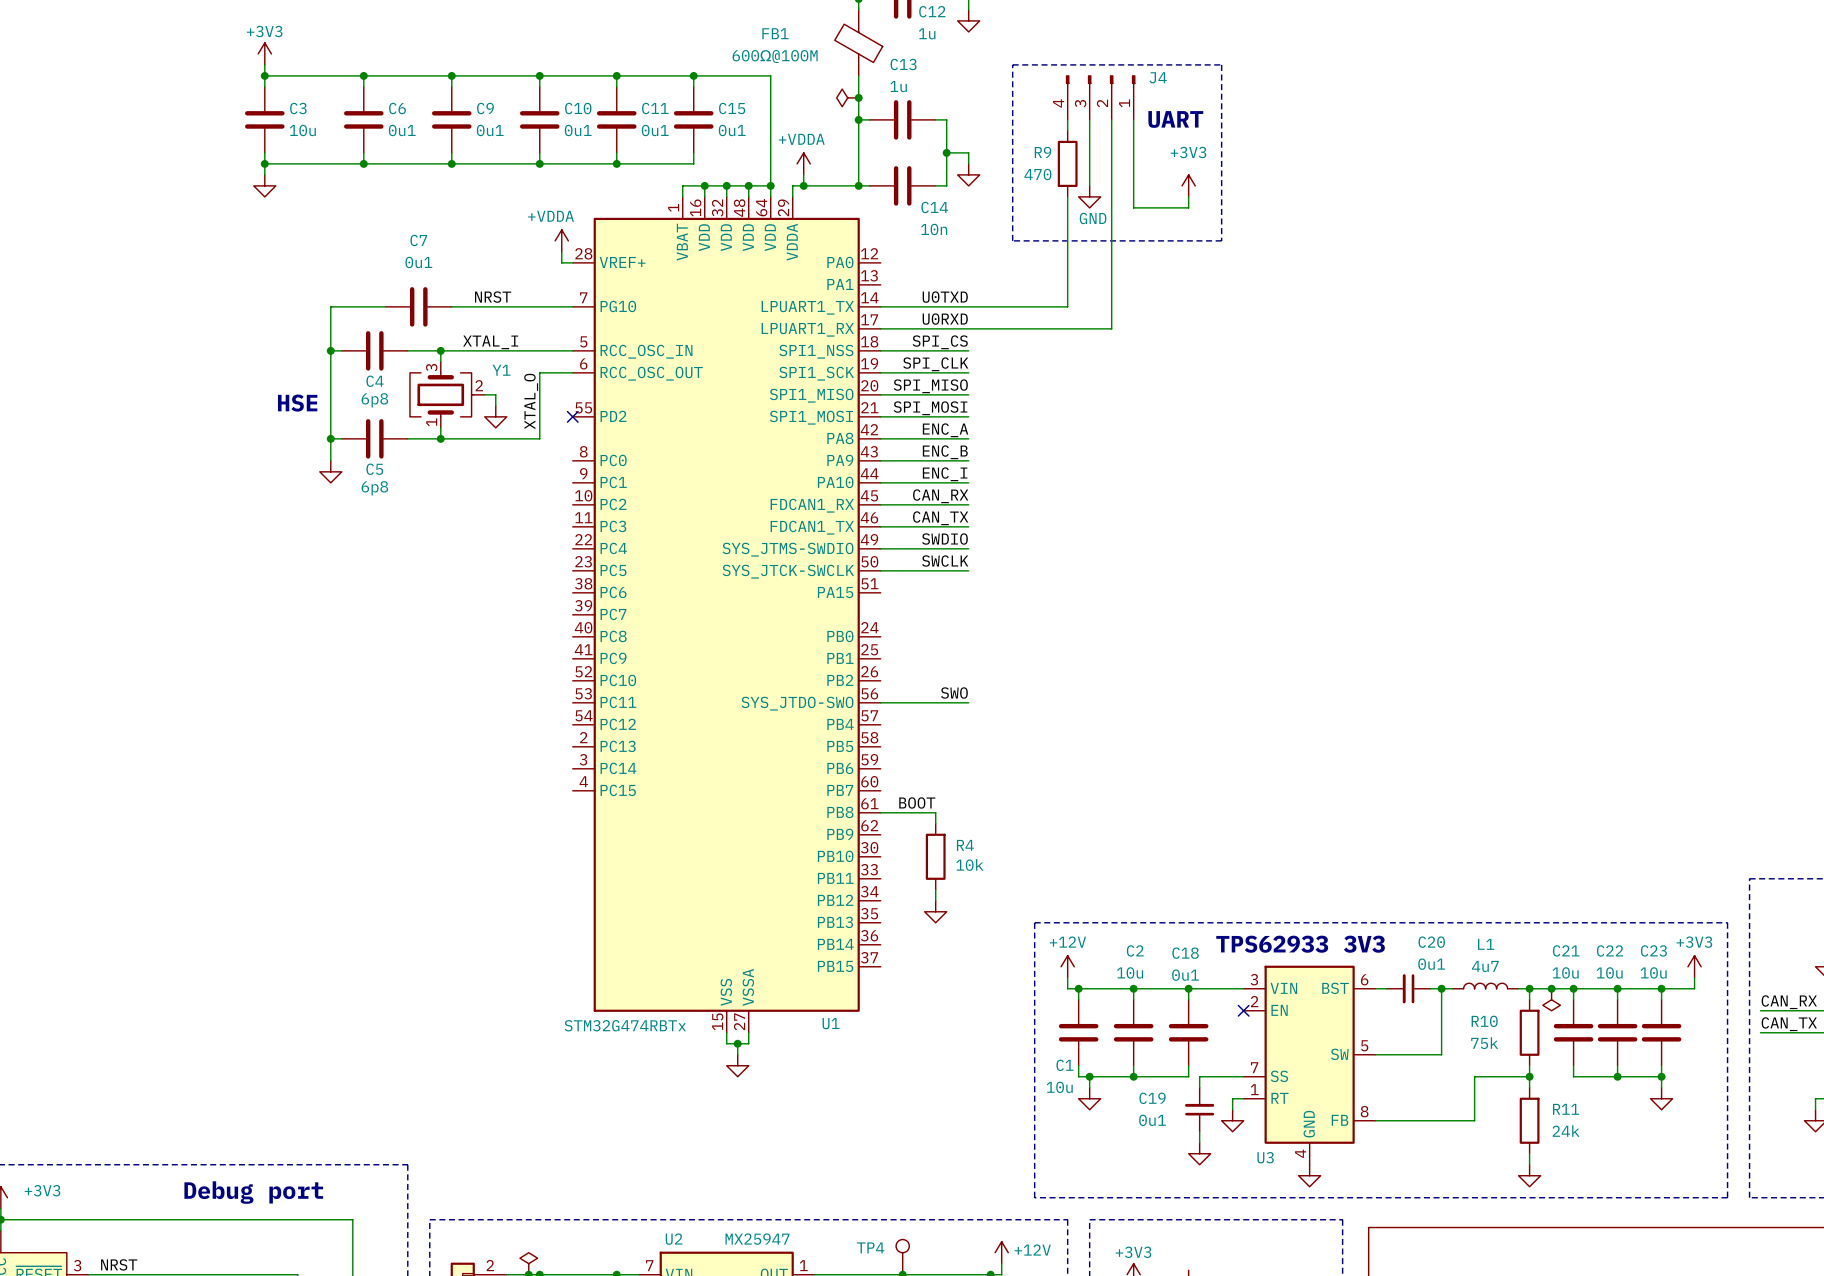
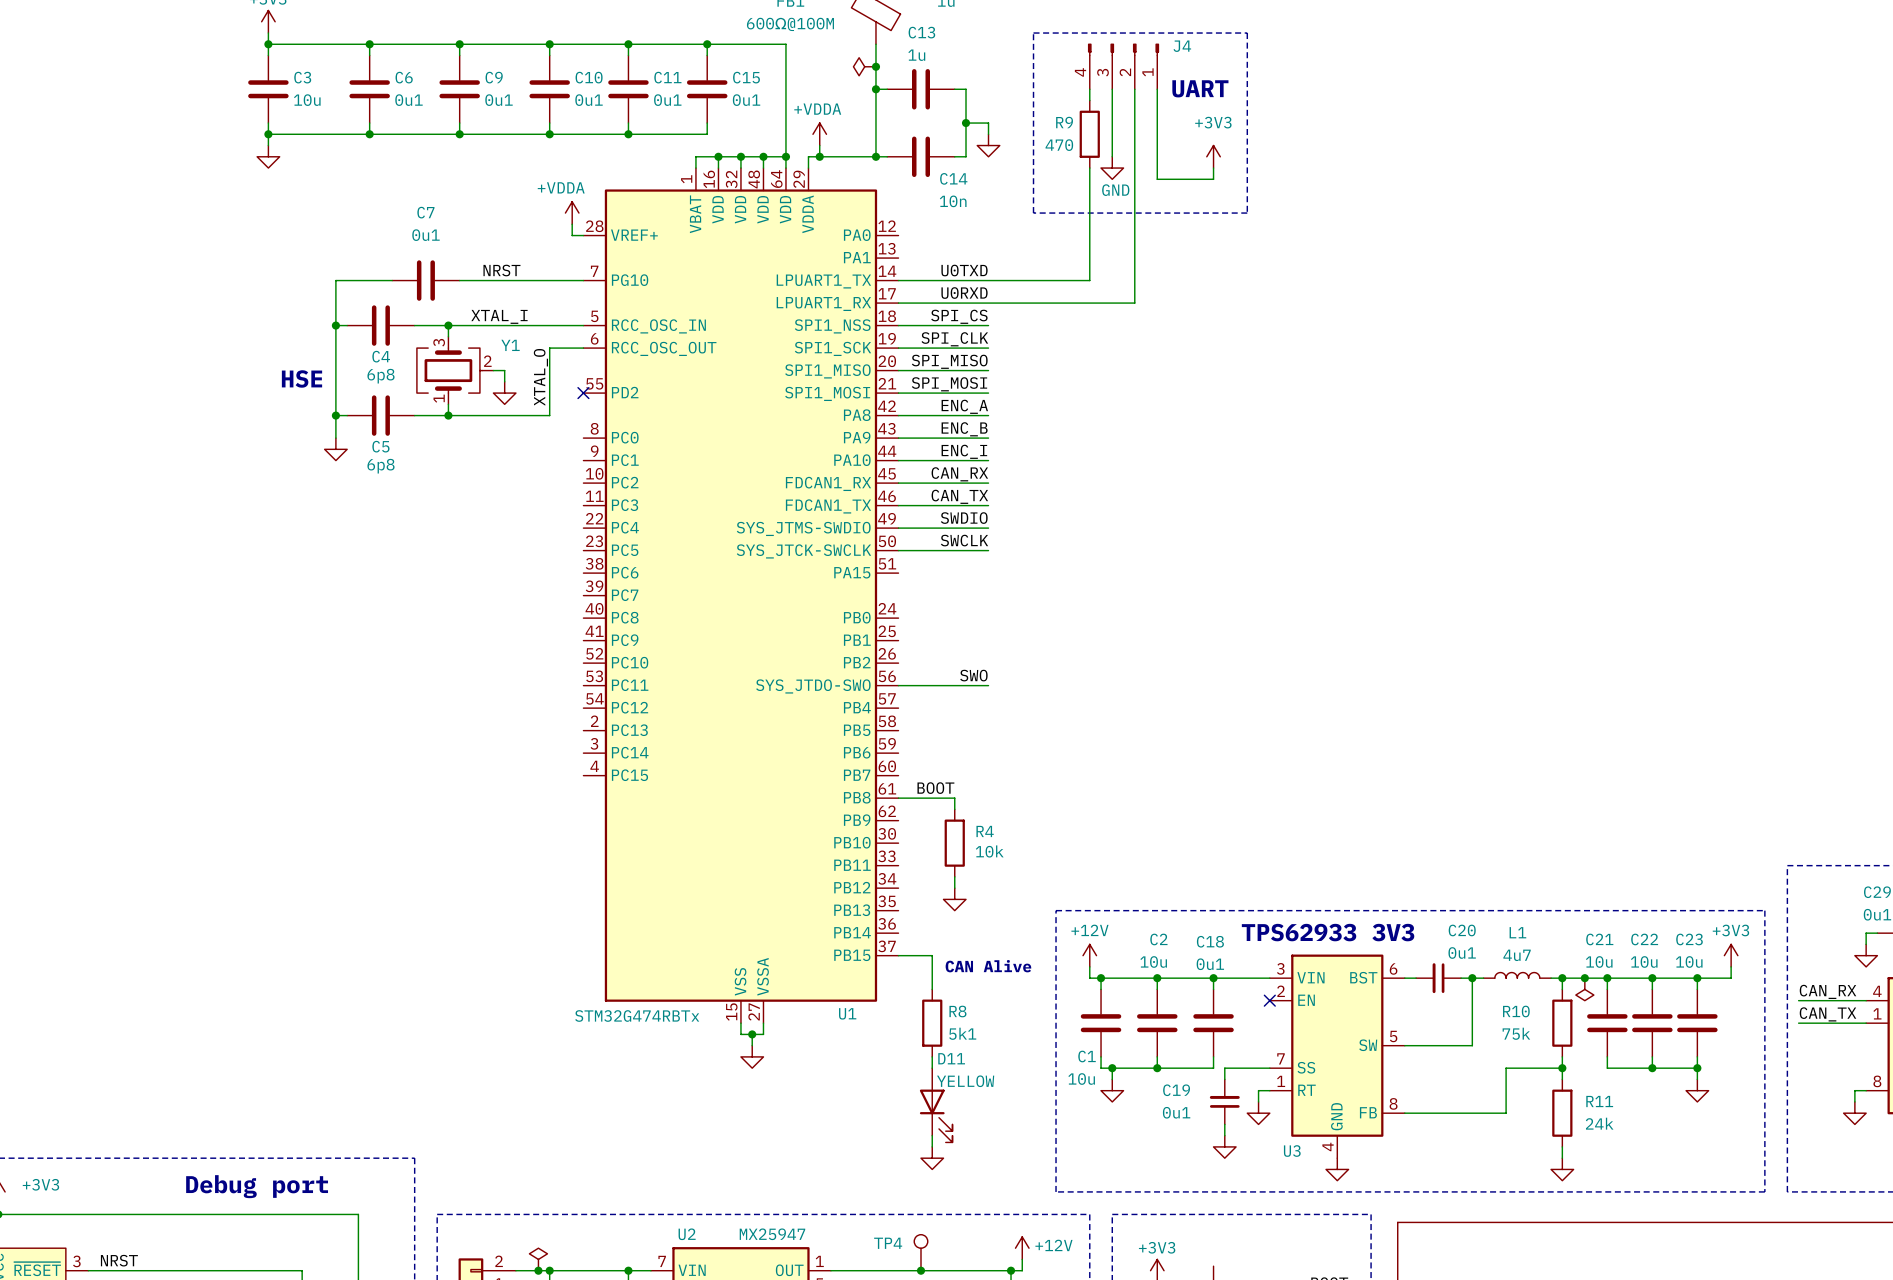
wire: none -> (898, 955) (932, 955) (932, 989)
text: none -> CAN Alive (988, 966)
R8: none -> 5k1 (932, 1023)
wire: none -> (932, 1056) (932, 1068)
D11: none -> YELLOW (936, 1105)
wire: none -> (932, 1135) (932, 1146)
power symbol: none -> (932, 1158)

